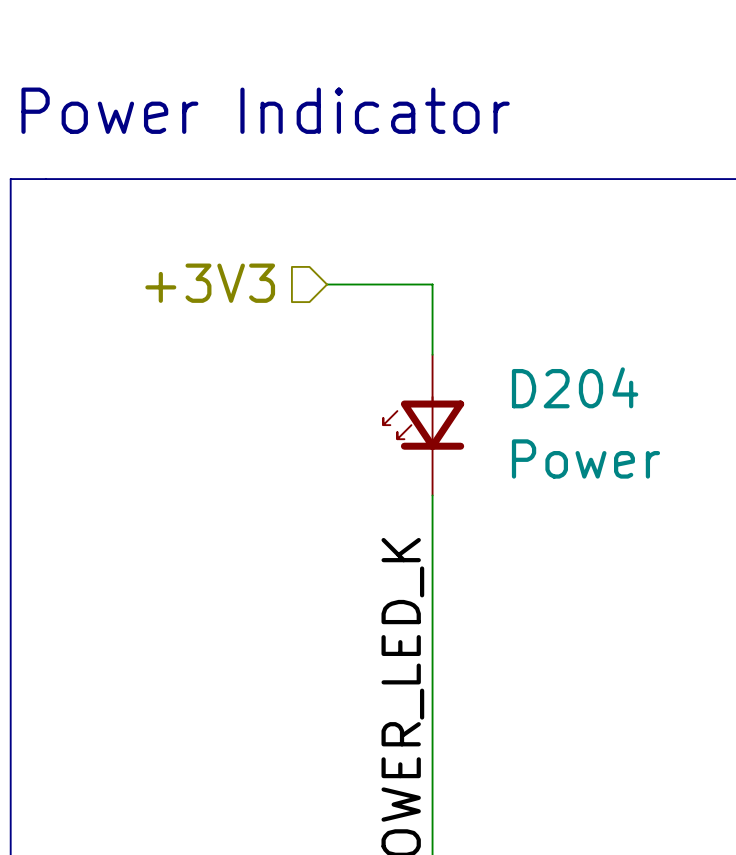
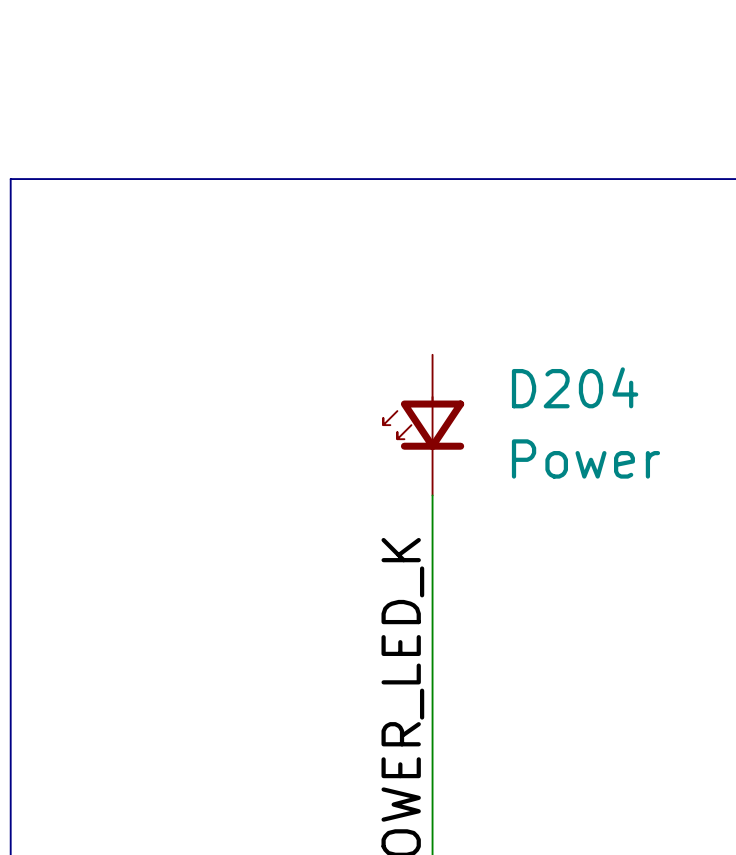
text: Power Indicator (265, 110) -> none
hierarchical label: +3V3 (210, 283) -> none
wire: (327, 284) (432, 284) (432, 354) -> none

